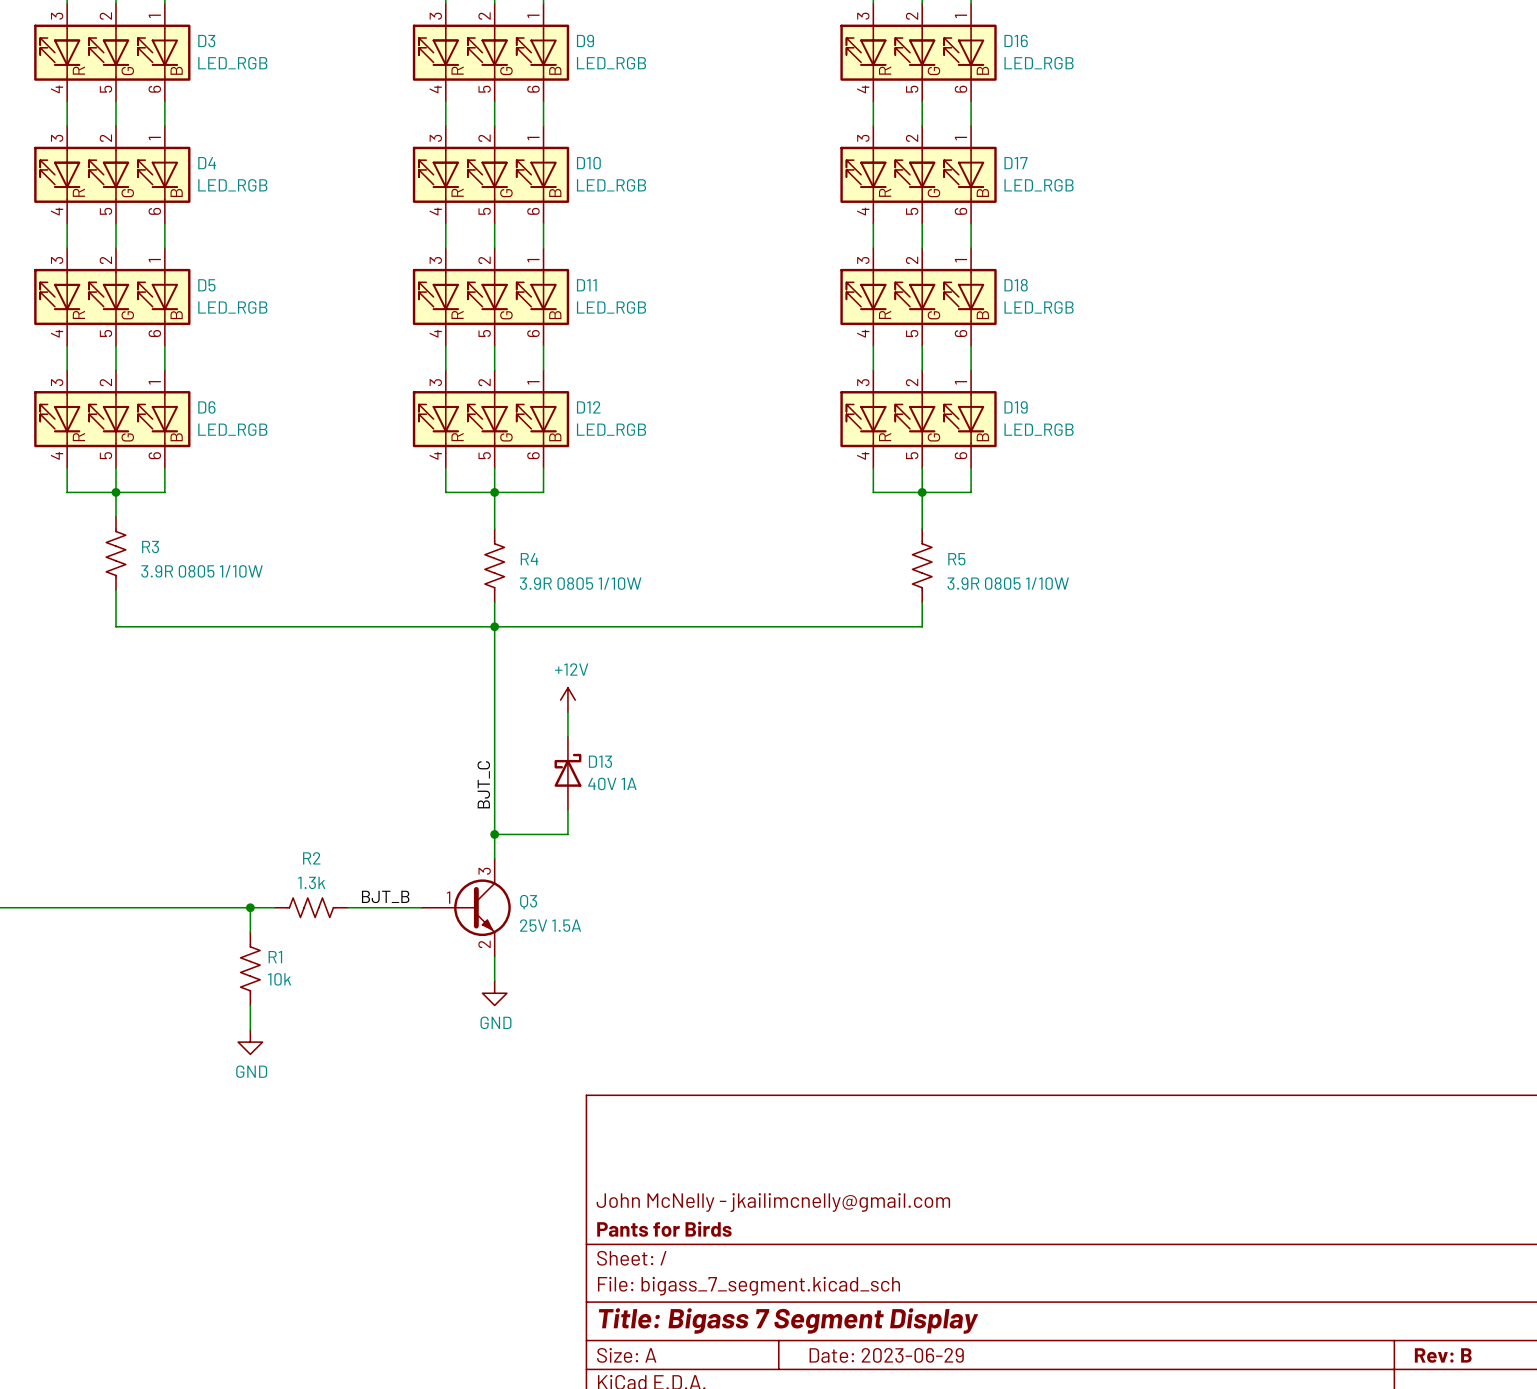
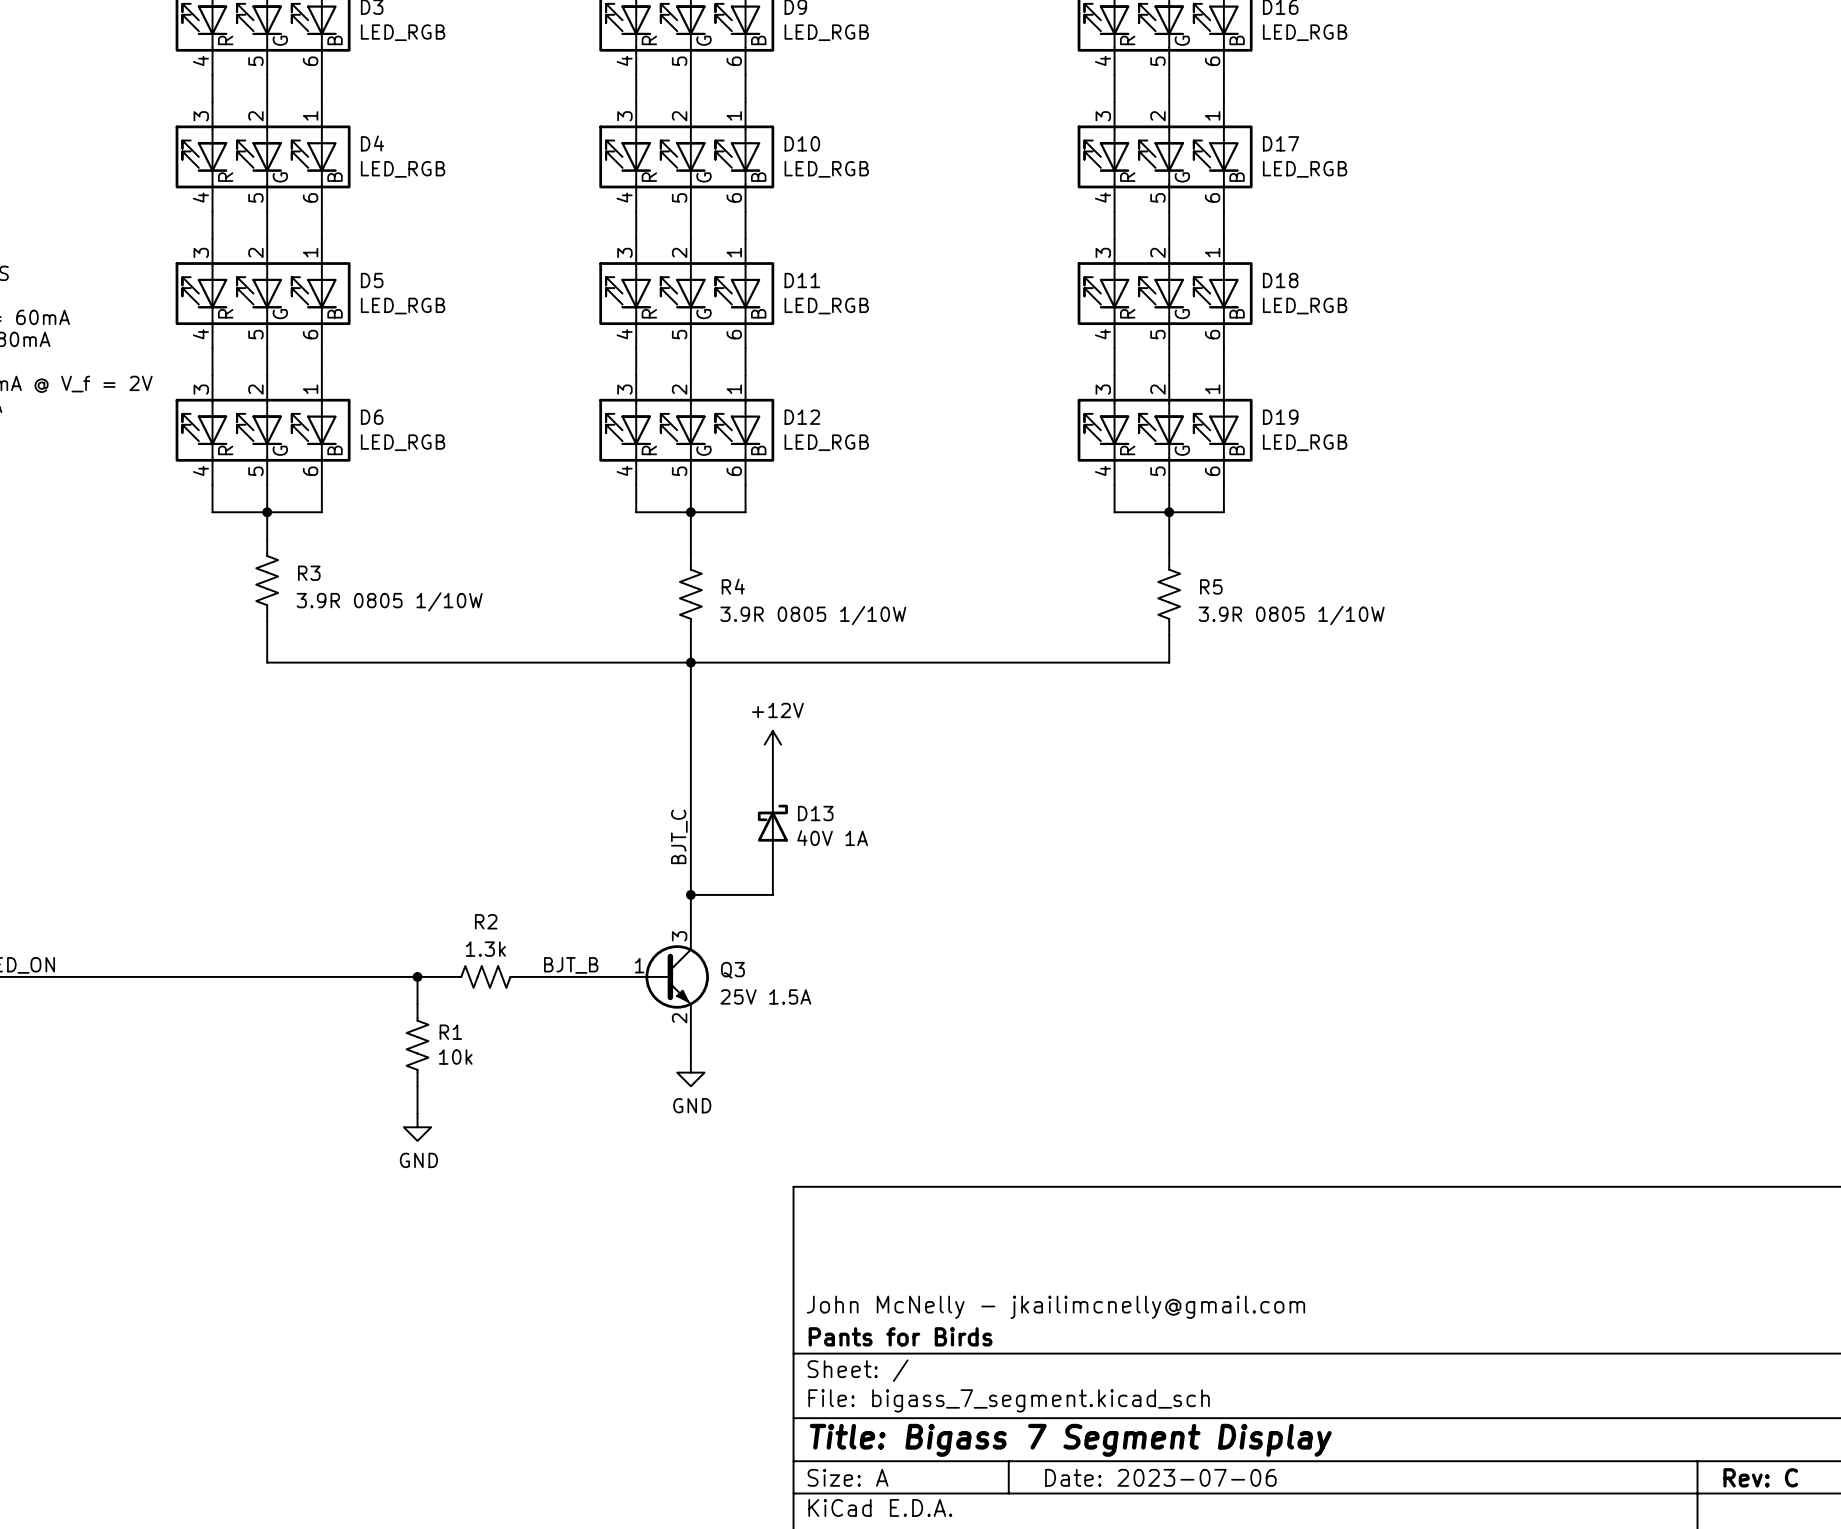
title block: Date: 2023-06-29 (886, 1355) -> Date: 2023-07-06 (1160, 1477)
title block: Rev: B (1443, 1355) -> Rev: C (1760, 1477)

